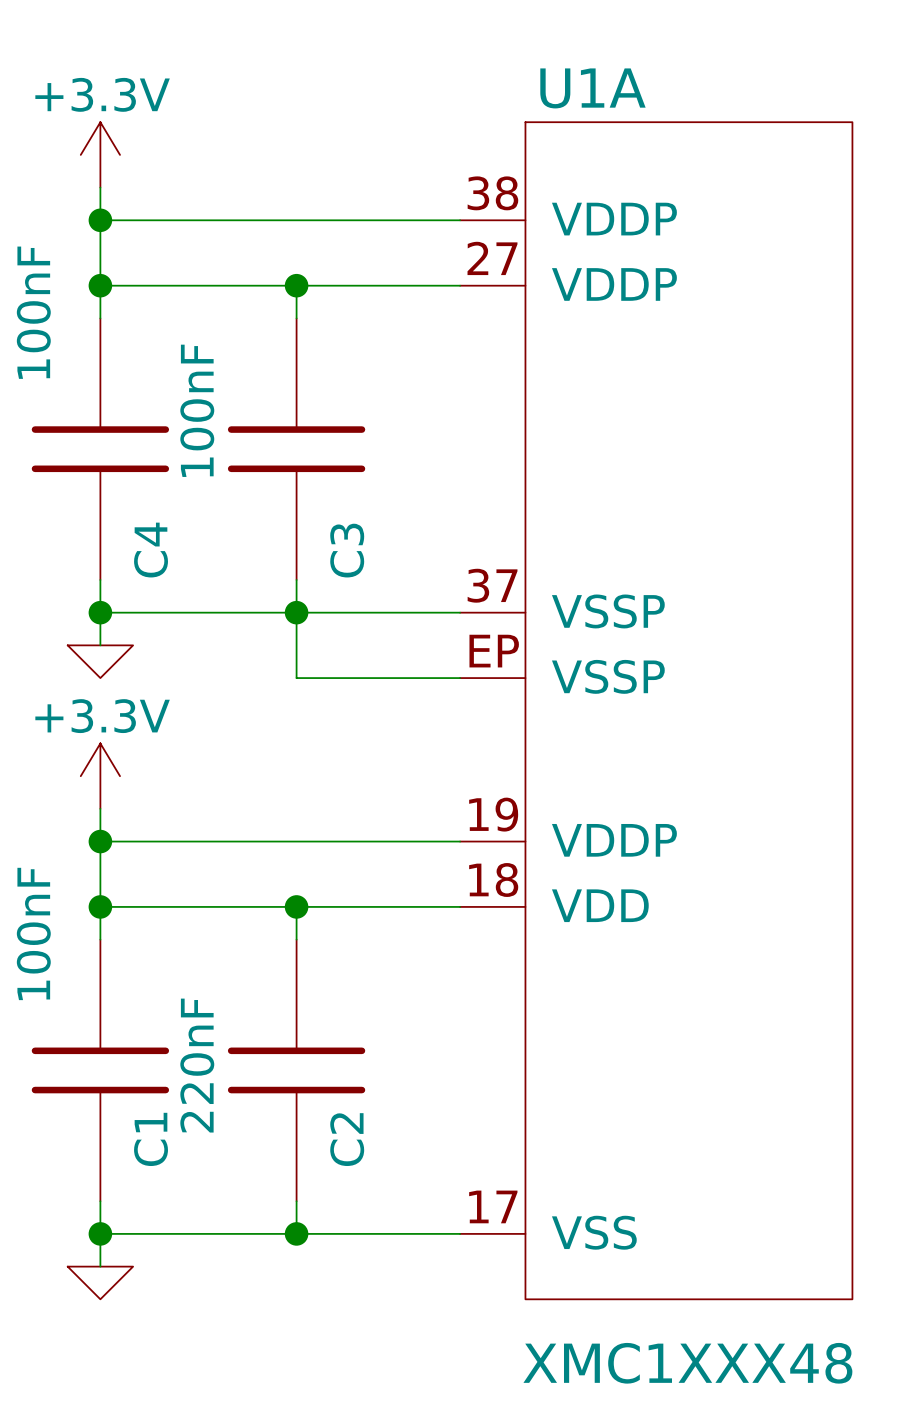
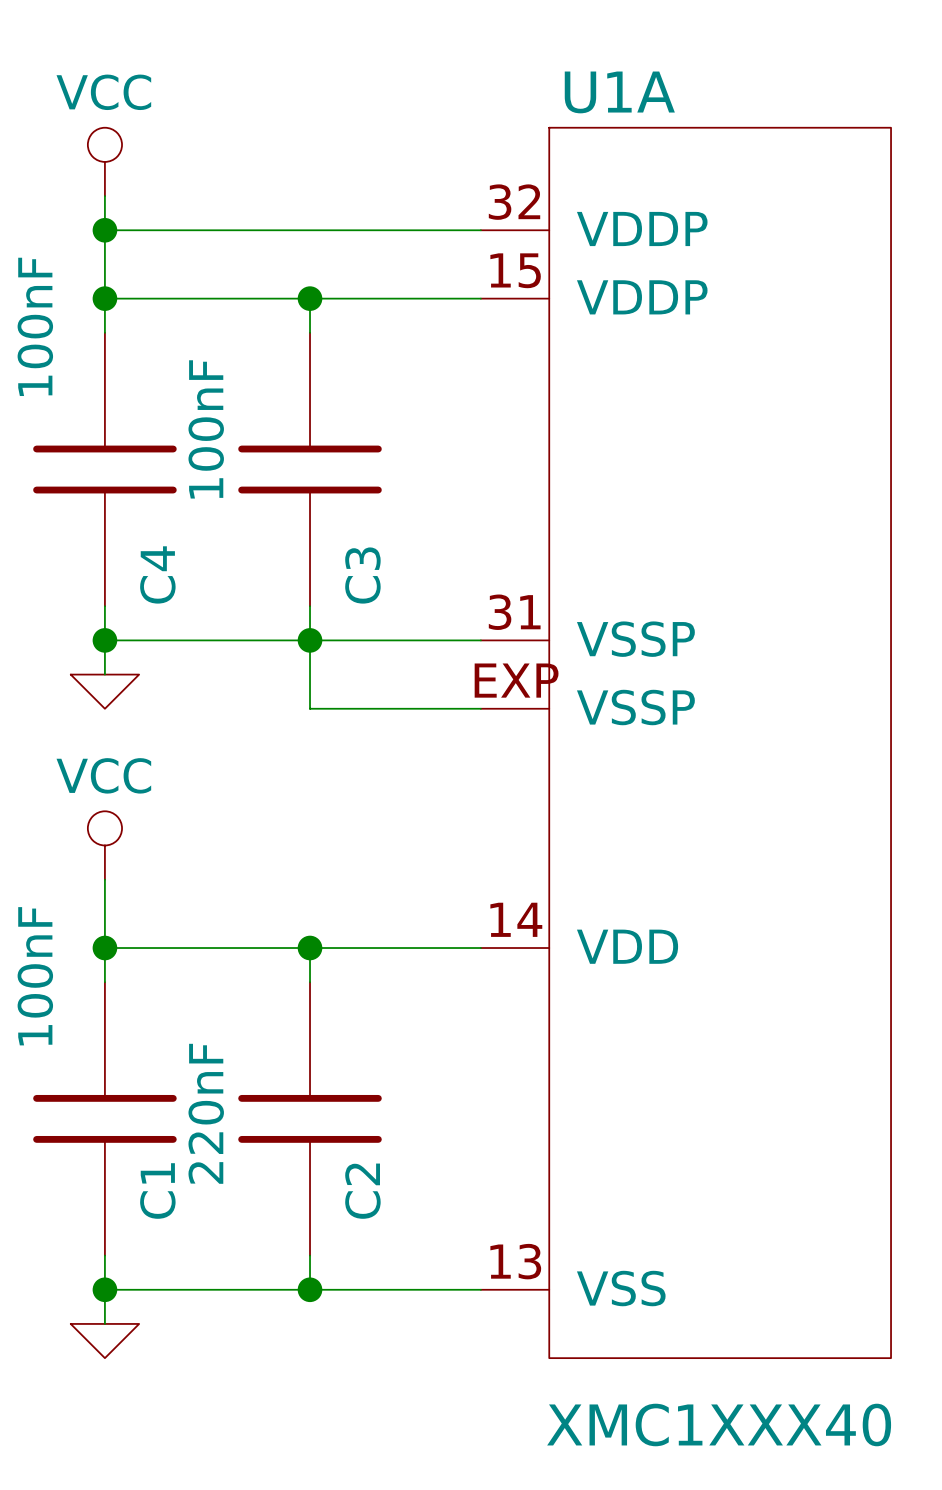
U1A symbol: [460, 122, 853, 1300] -> [480, 127, 892, 1359]
power symbol: +3.3V (100, 154) -> VCC (104, 161)
power symbol: +3.3V (100, 776) -> none
wire: (100, 808) (100, 841) (460, 841) -> none
power symbol: none -> VCC (104, 845)
junction: (100, 841) -> none
U1A value: XMC1XXX48 (687, 1363) -> XMC1XXX40 (719, 1424)

